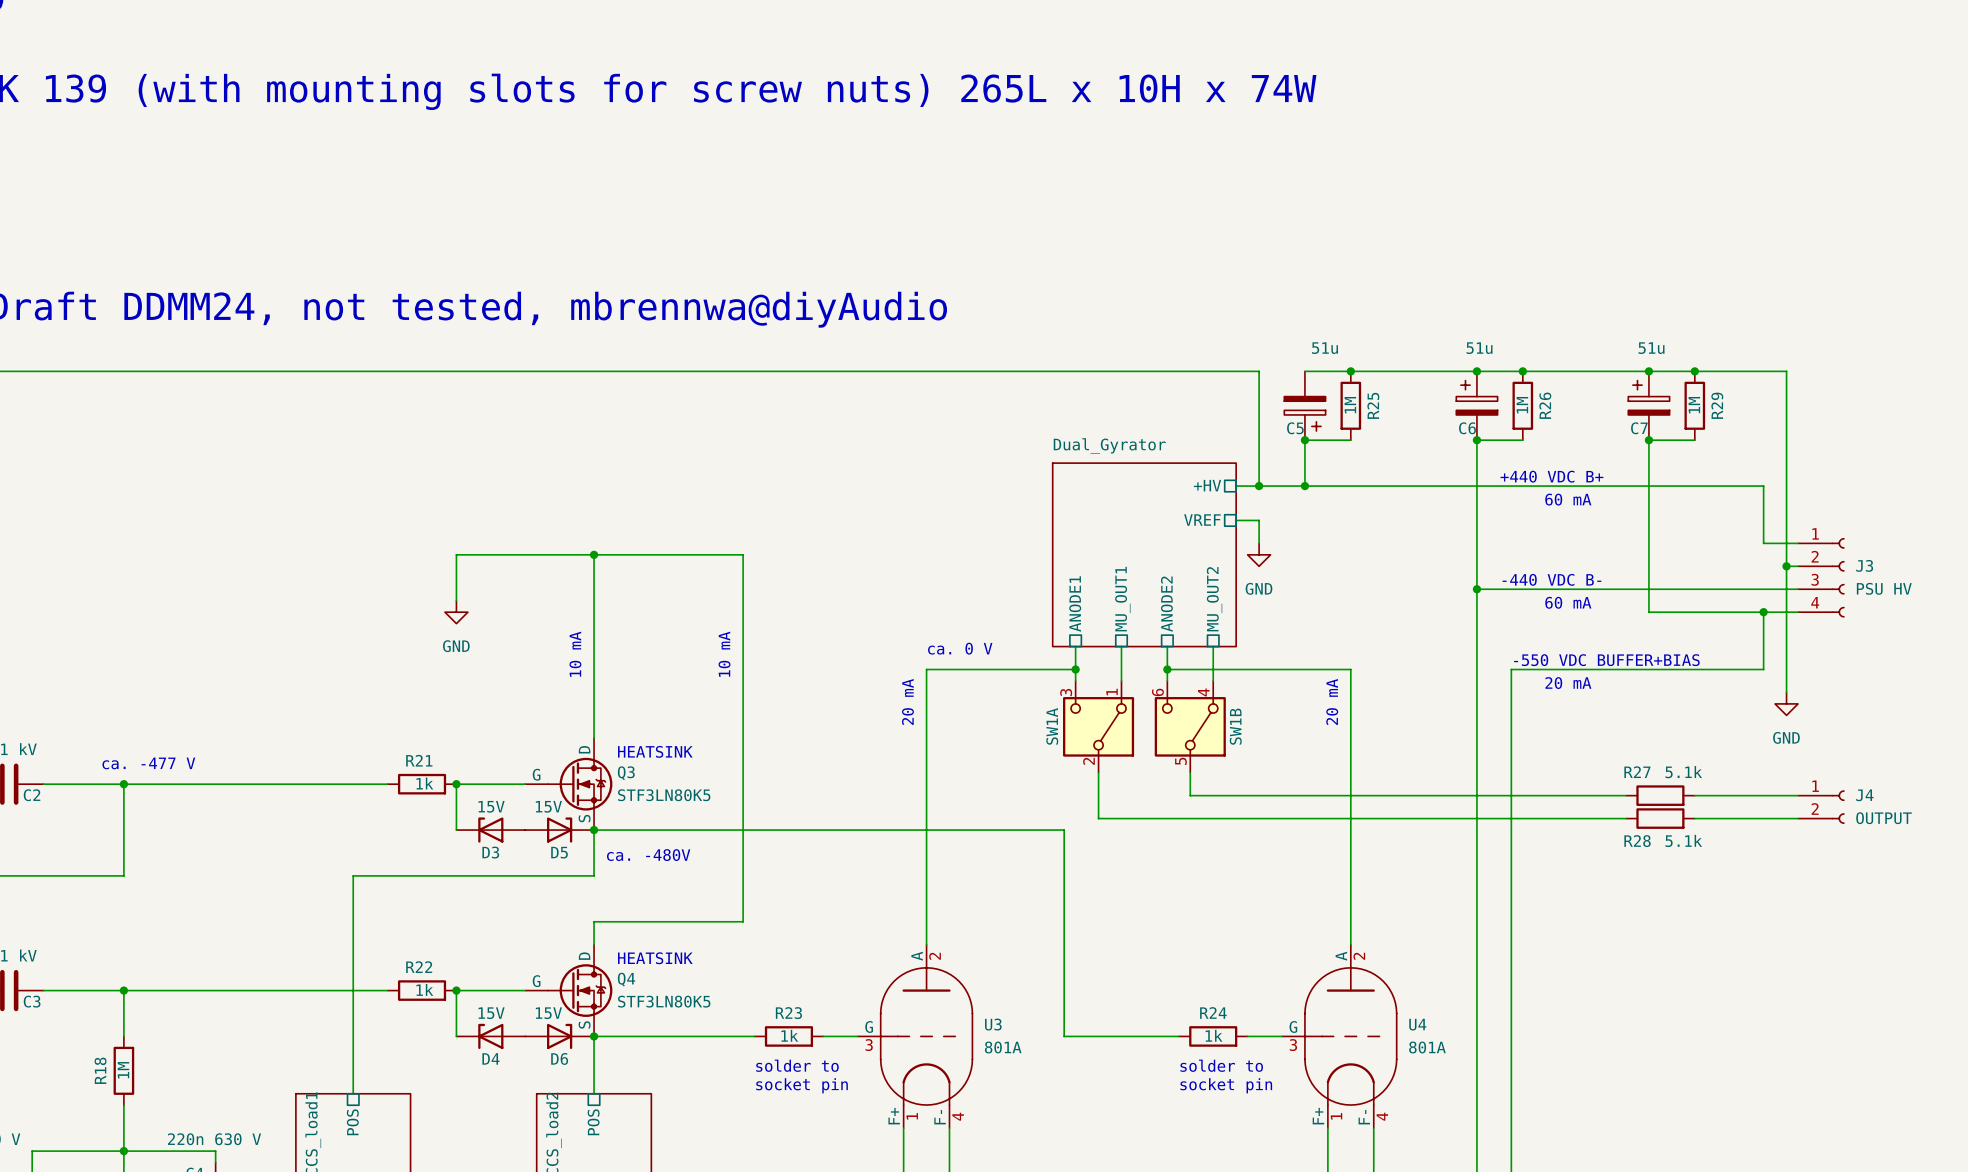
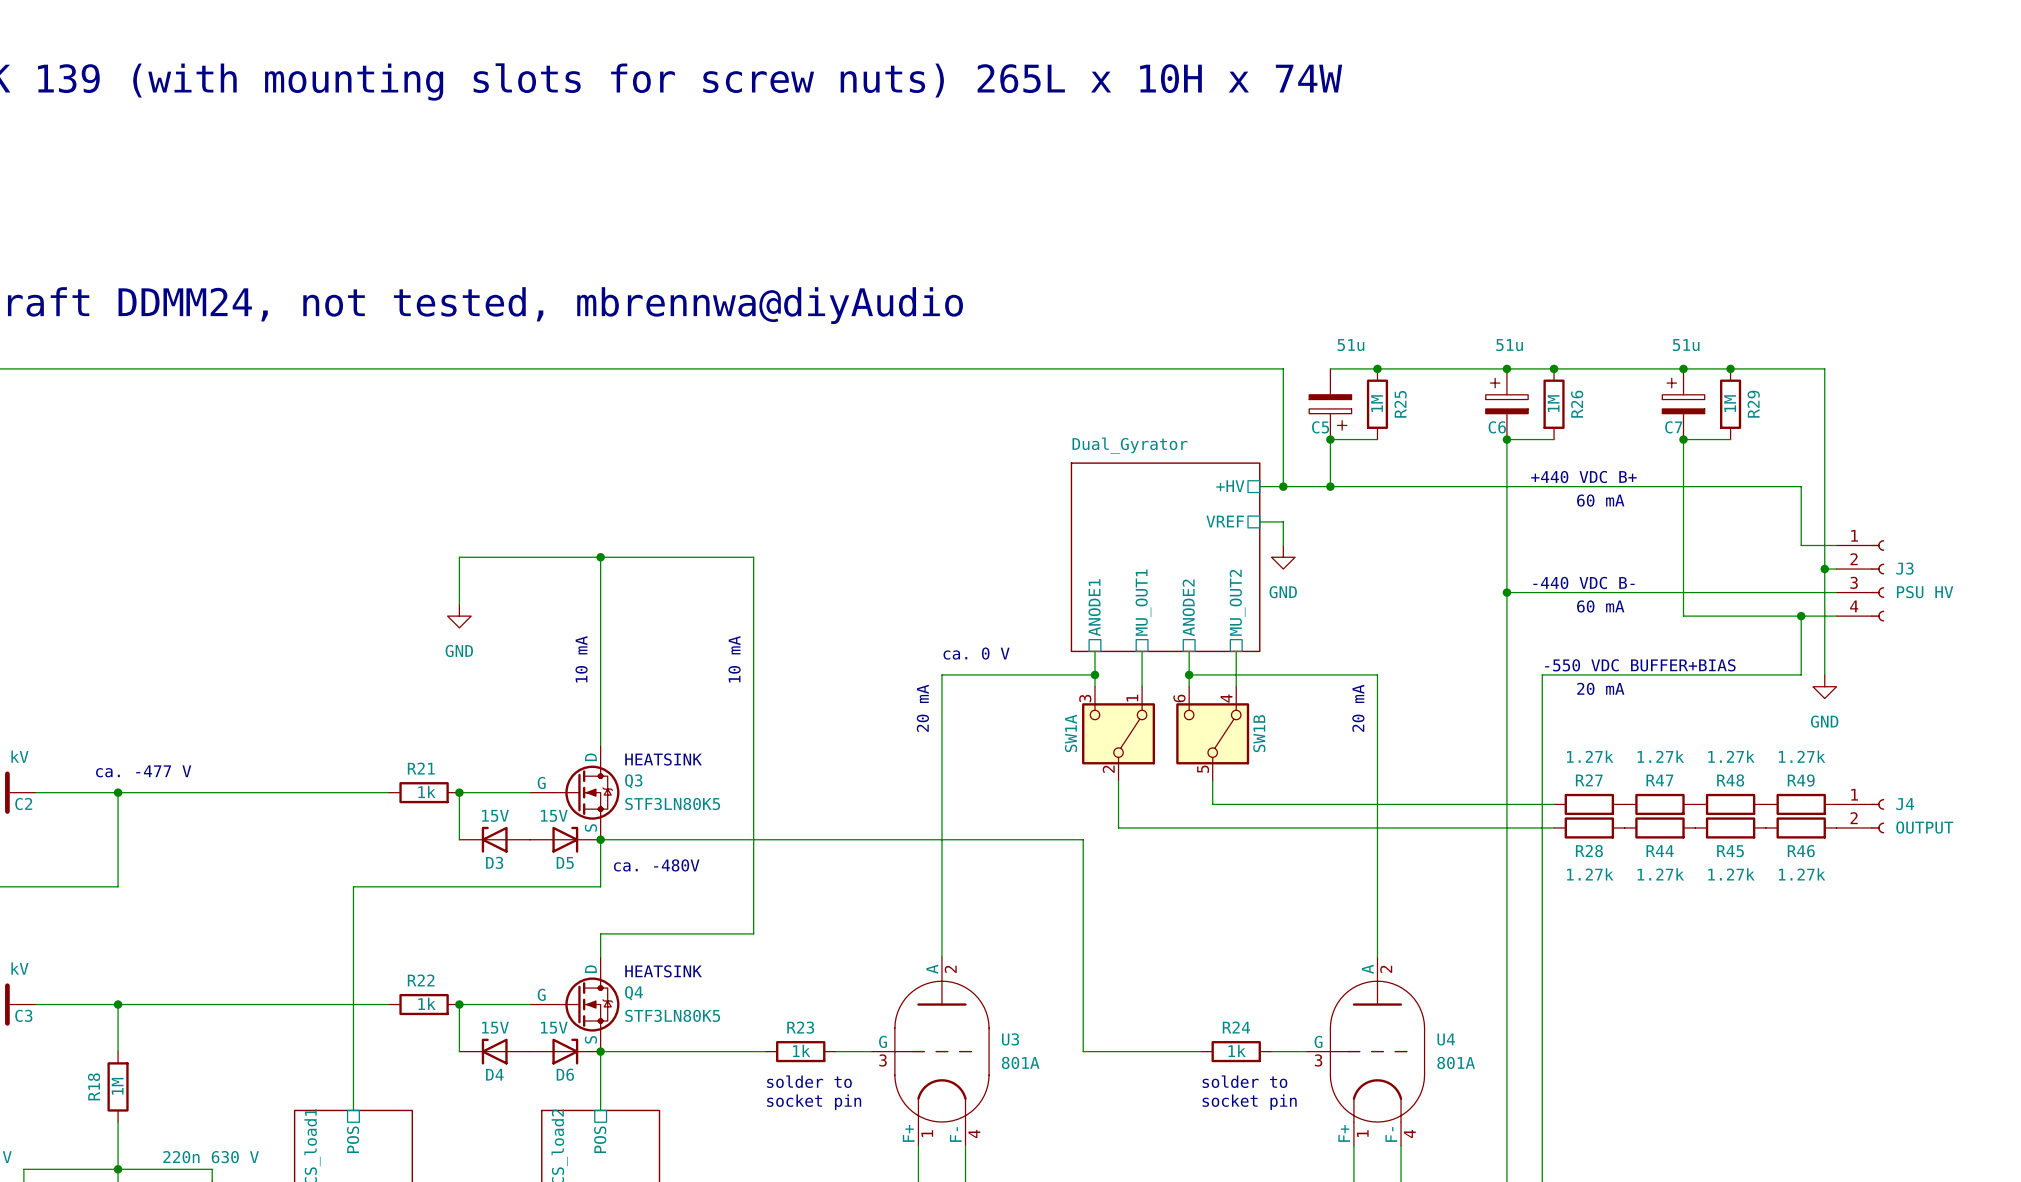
power symbol position: GND (1786, 703) -> GND (1824, 686)
R27 name position: R27 (1637, 772) -> R27 (1589, 780)
R27 value: 5.1k (1683, 772) -> 1.27k (1590, 756)
wire: (1522, 795) (1626, 795) -> none
R47: none -> 1.27k (1659, 804)
R27 position: (1660, 795) -> (1589, 804)
wire: (1694, 795) (1798, 795) -> none
R48: none -> 1.27k (1730, 804)
R49: none -> 1.27k (1801, 804)
wire: (1522, 818) (1626, 818) -> none
R44: none -> 1.27k (1659, 827)
R28 position: (1660, 818) -> (1589, 827)
wire: (1694, 818) (1798, 818) -> none
R45: none -> 1.27k (1730, 827)
R46: none -> 1.27k (1801, 827)
R28 value: 5.1k (1683, 840) -> 1.27k (1590, 874)
R28 name position: R28 (1637, 841) -> R28 (1589, 851)

